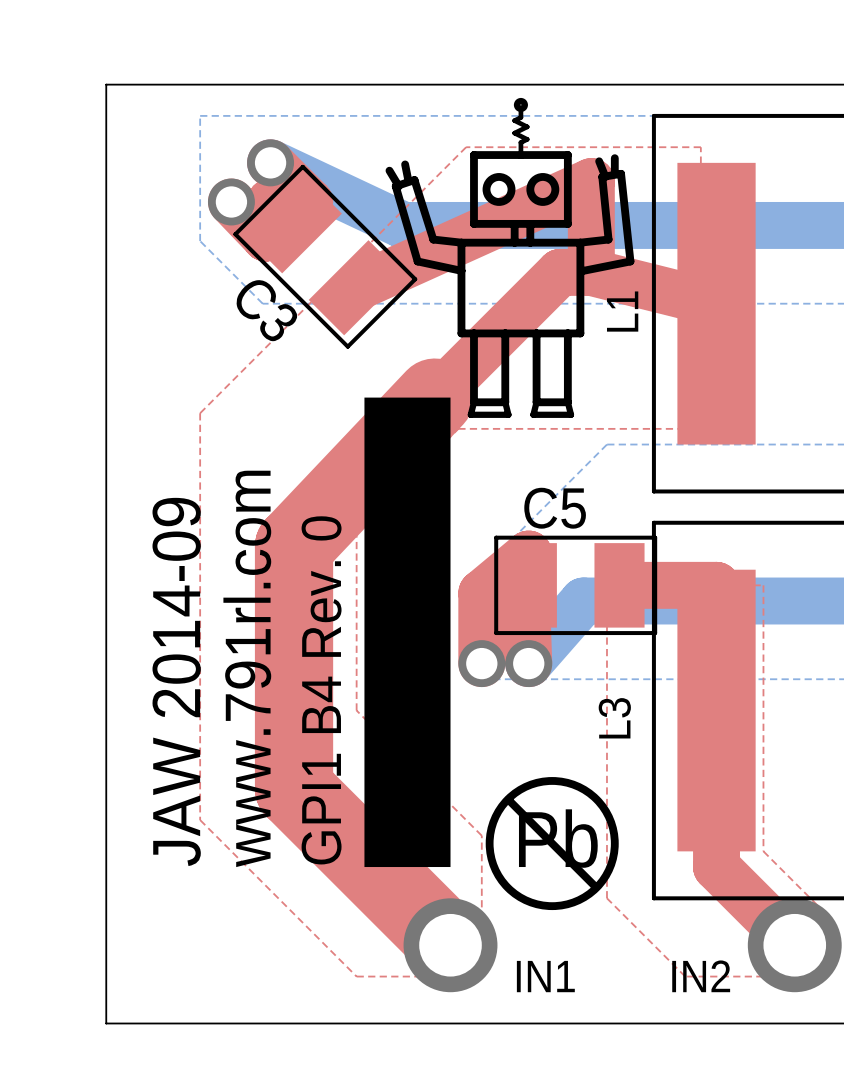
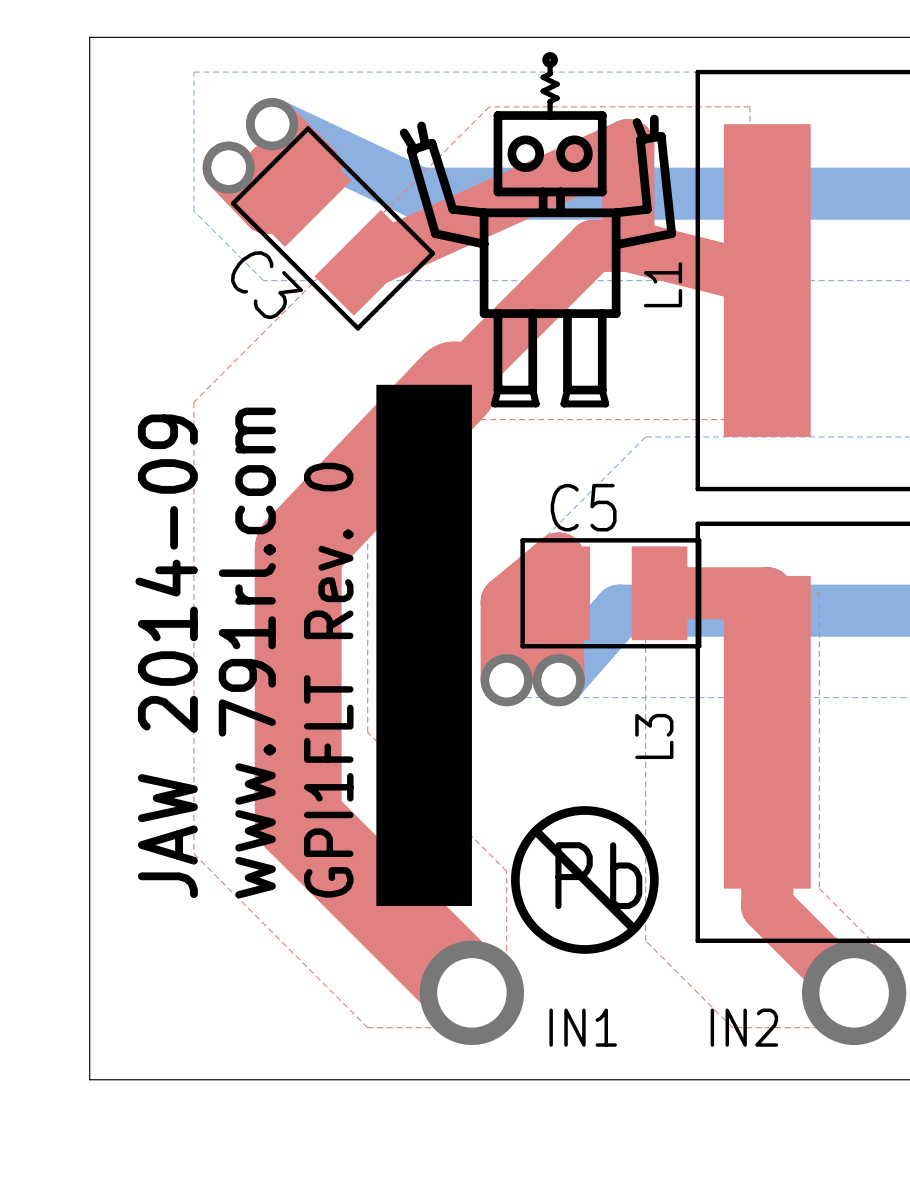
text: GPI1 B4 Rev. 0 (321, 690) -> GPI1FLT Rev. 0 (328, 680)

